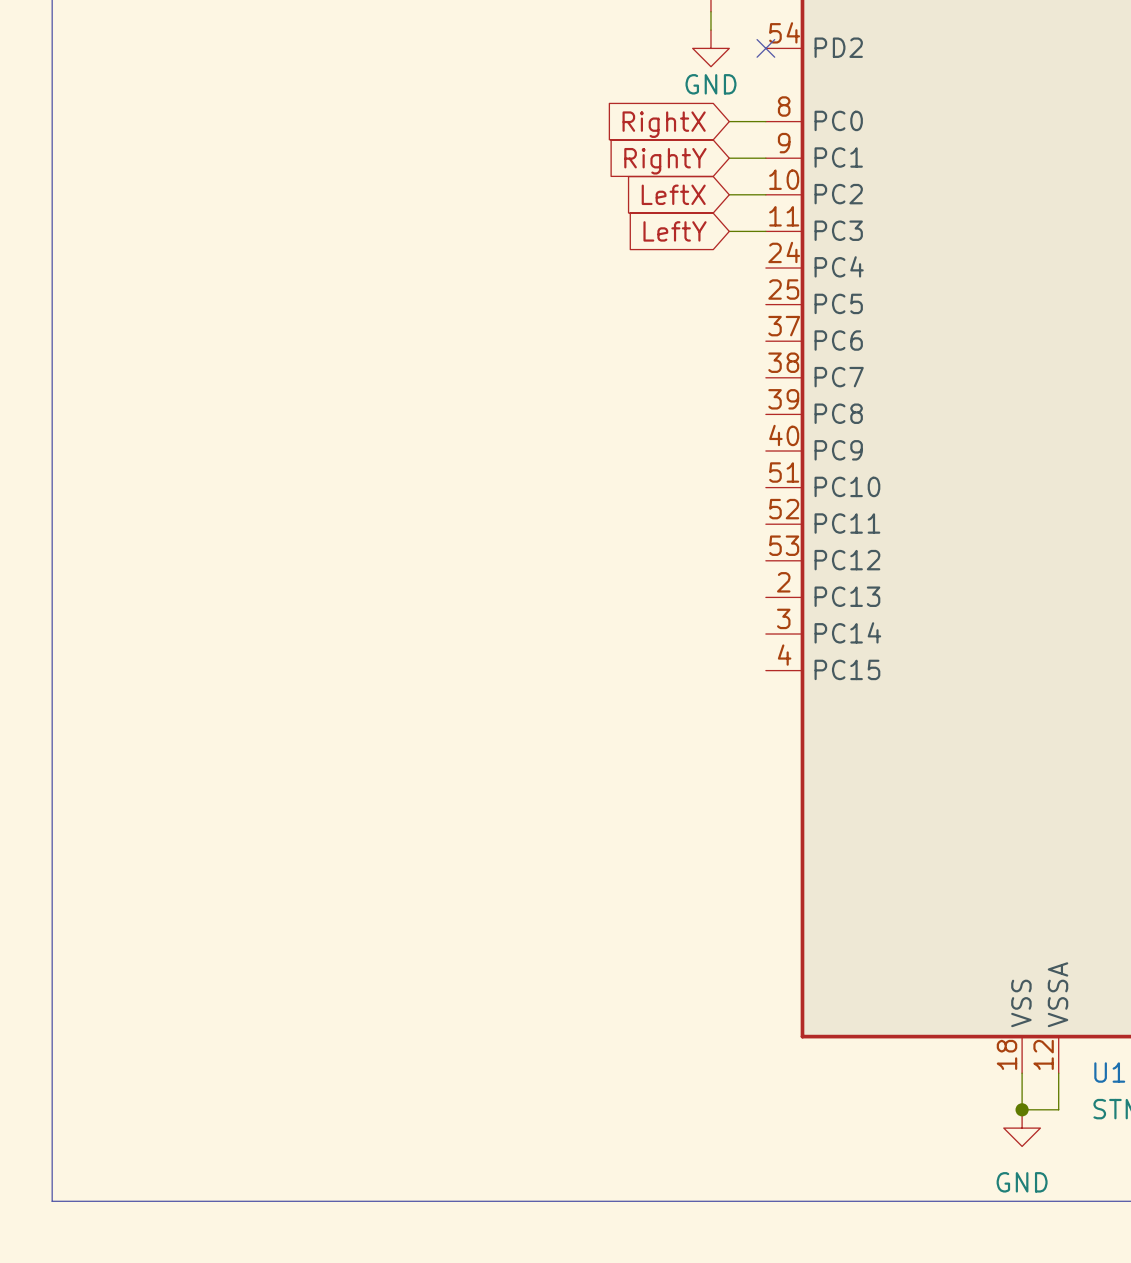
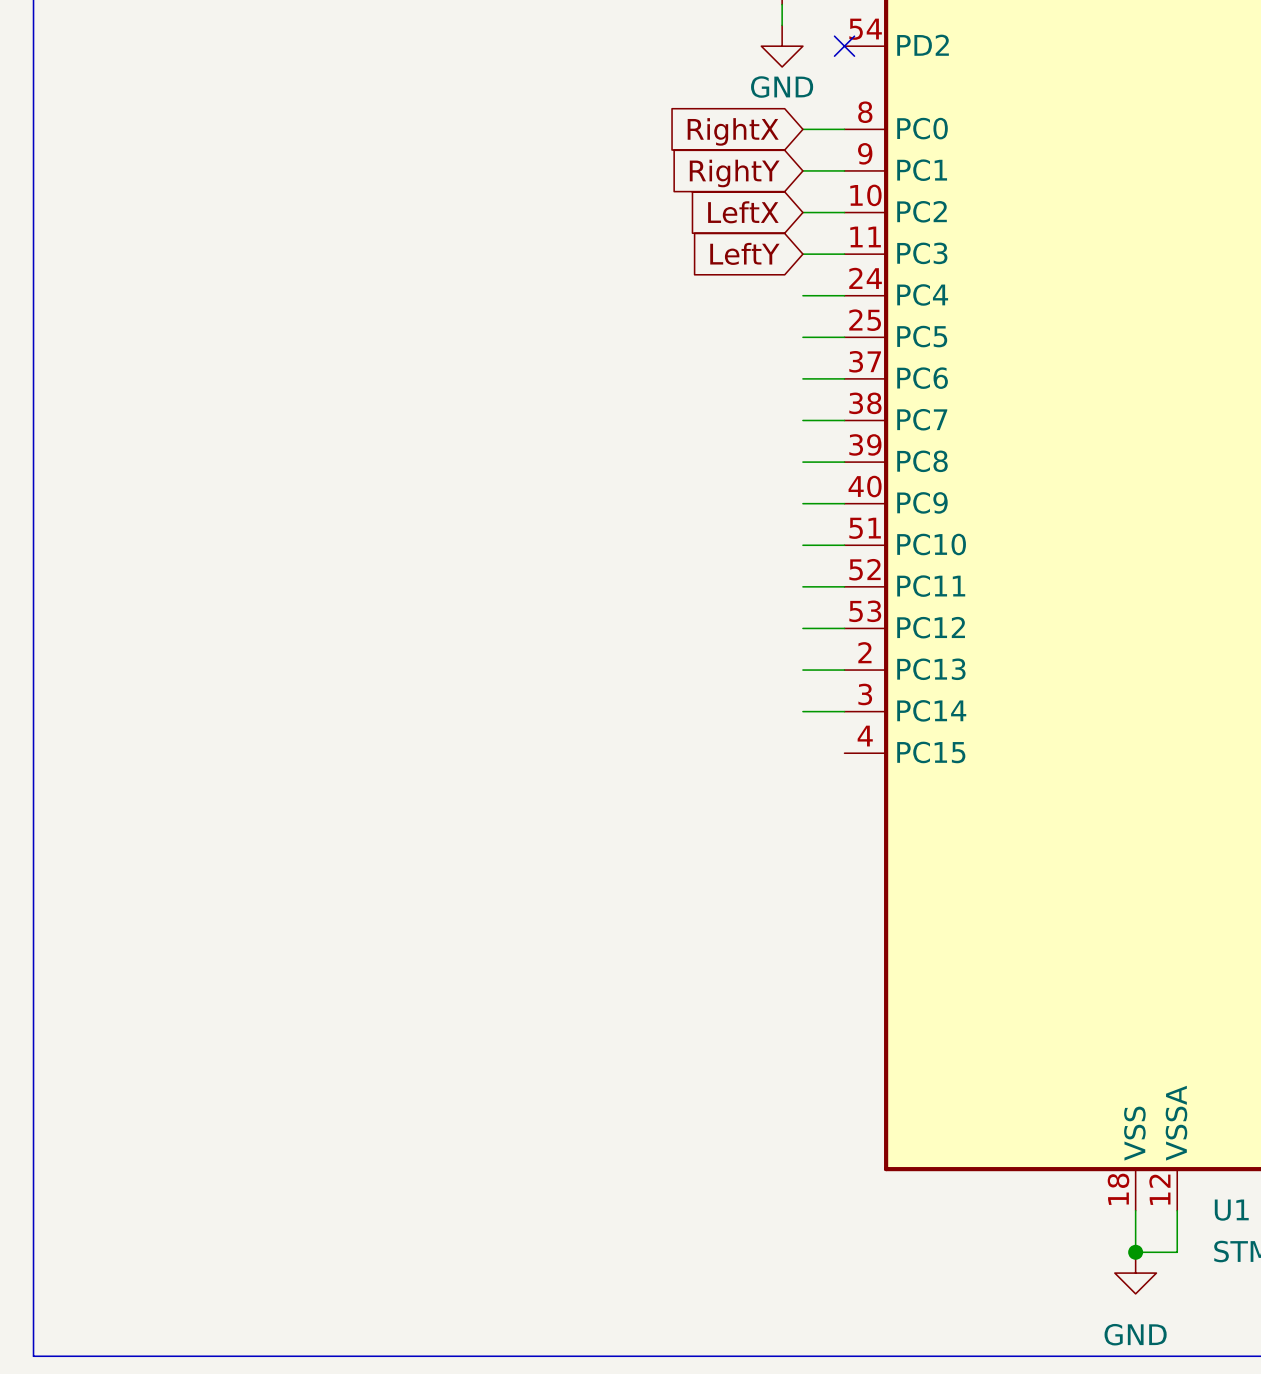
wire: none -> (802, 295) (844, 295)
wire: none -> (802, 337) (844, 337)
wire: none -> (802, 378) (844, 378)
wire: none -> (802, 420) (844, 420)
wire: none -> (802, 462) (844, 462)
wire: none -> (802, 503) (844, 503)
wire: none -> (802, 545) (844, 545)
wire: none -> (802, 586) (844, 586)
wire: none -> (802, 628) (844, 628)
wire: none -> (802, 670) (844, 670)
wire: none -> (802, 711) (844, 711)

